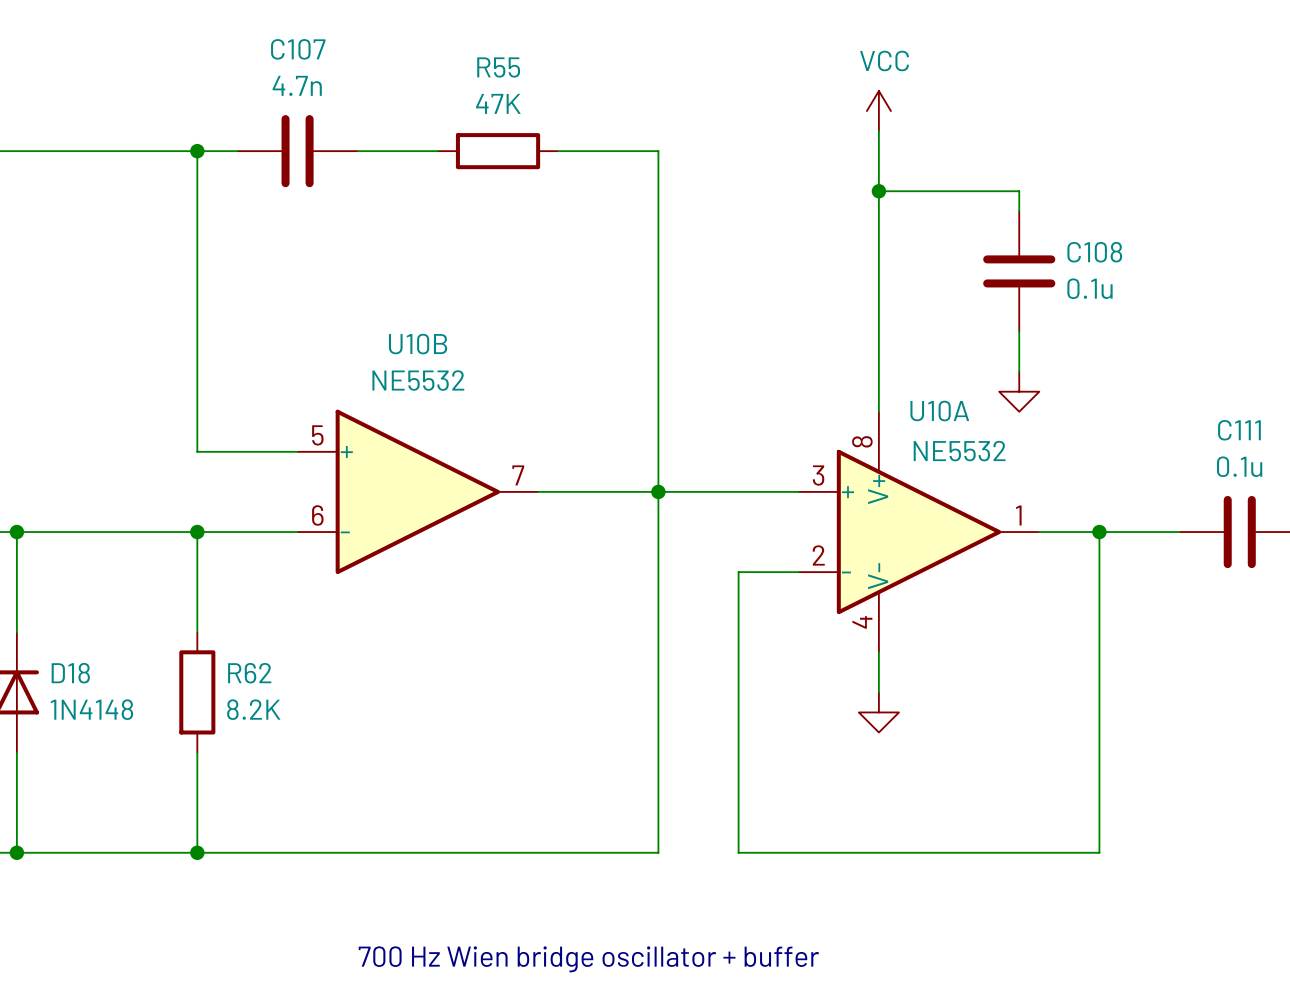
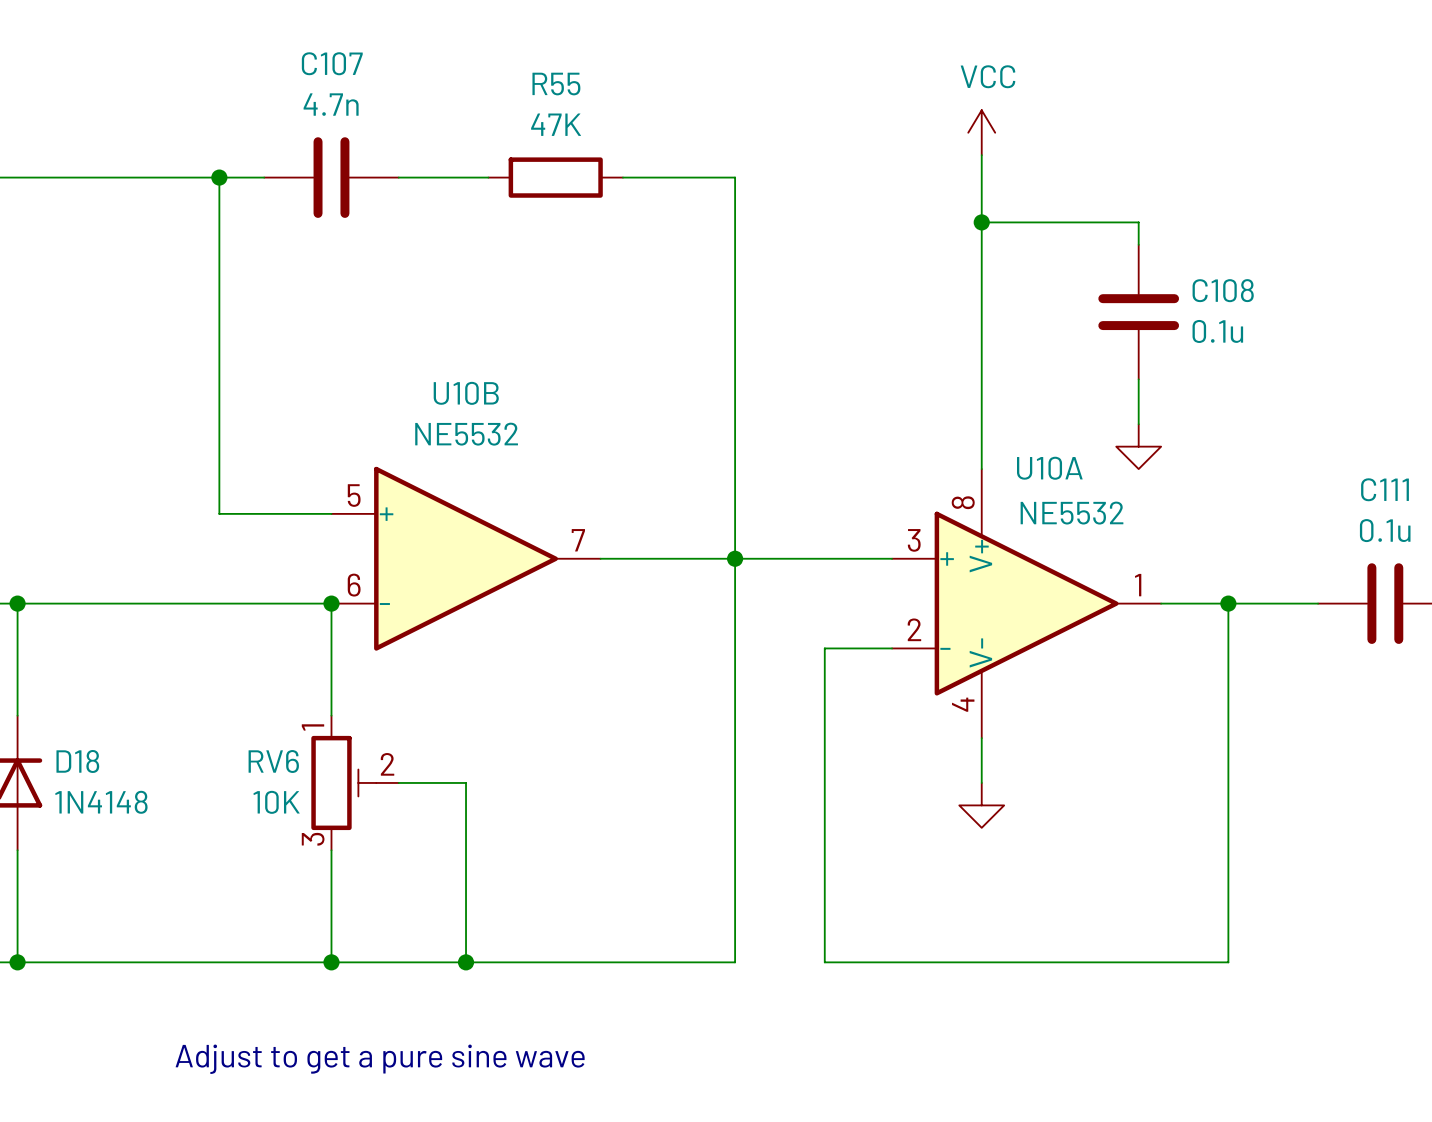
wire: (197, 532) (197, 632) -> (331, 603) (331, 715)
junction: (197, 532) -> none
junction: none -> (331, 603)
R62: 8.2K (197, 692) -> none
RV6: none -> 10K (355, 782)
wire: none -> (398, 782) (466, 782) (466, 962)
wire: (197, 752) (197, 852) -> (331, 850) (331, 962)
junction: (197, 852) -> none
junction: none -> (331, 962)
junction: none -> (466, 962)
text: none -> Adjust to get a pure sine wave (380, 1059)
text: 700 Hz Wien bridge oscillator + buffer (588, 959) -> none

